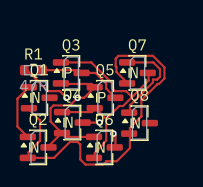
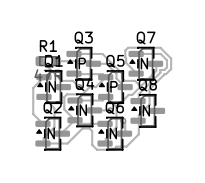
via: (77, 97) -> none

